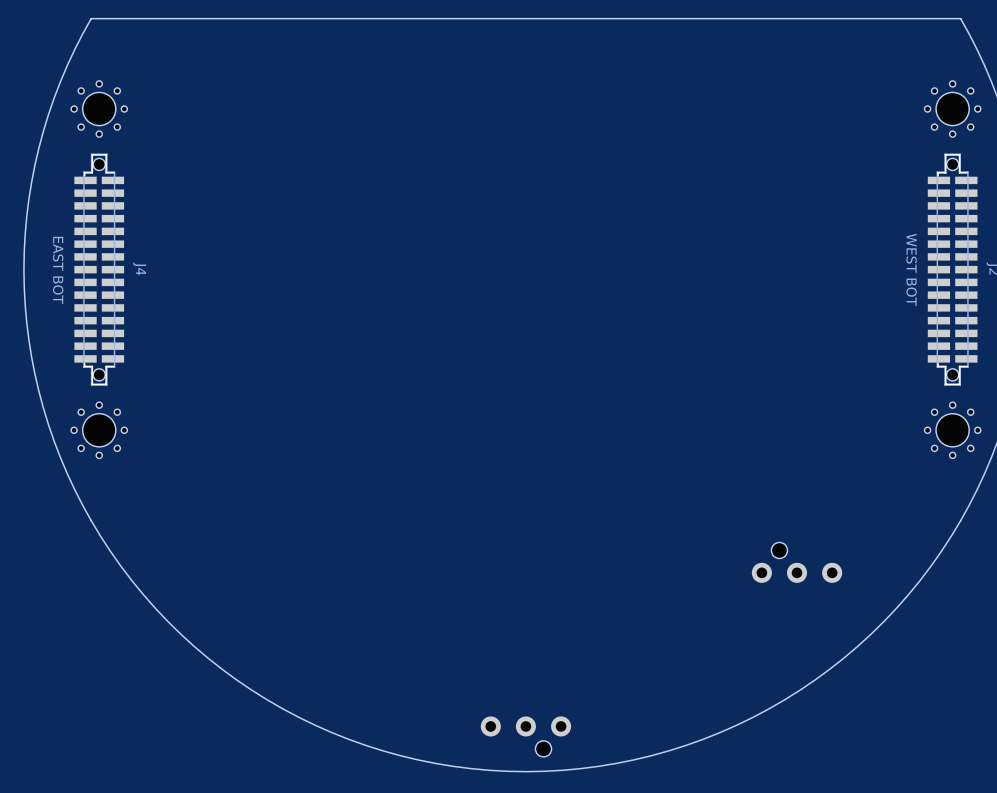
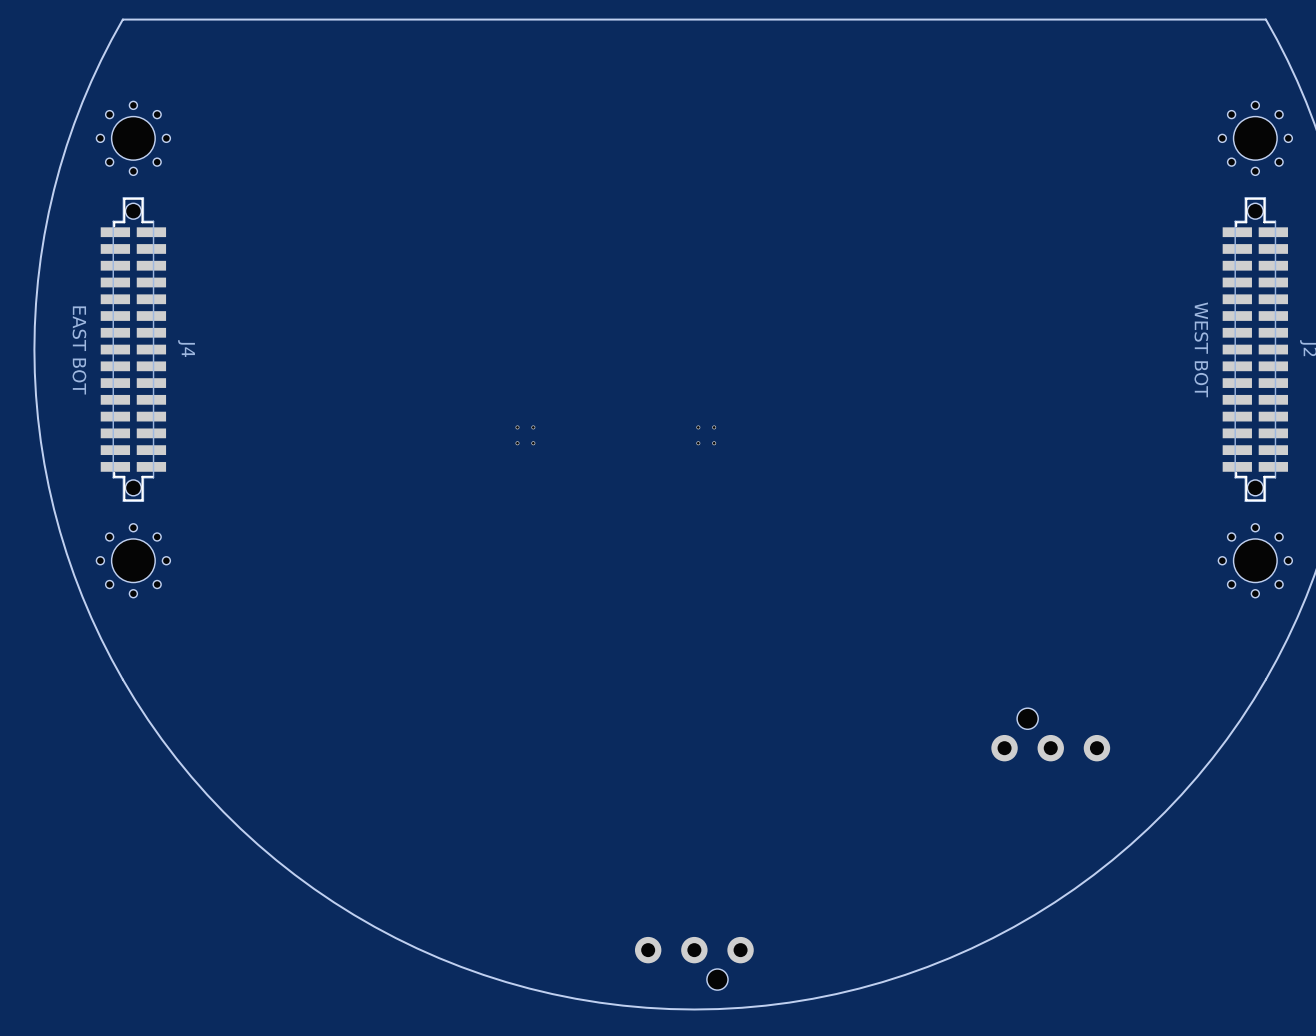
part: none -> (525, 435)
part: none -> (706, 435)

